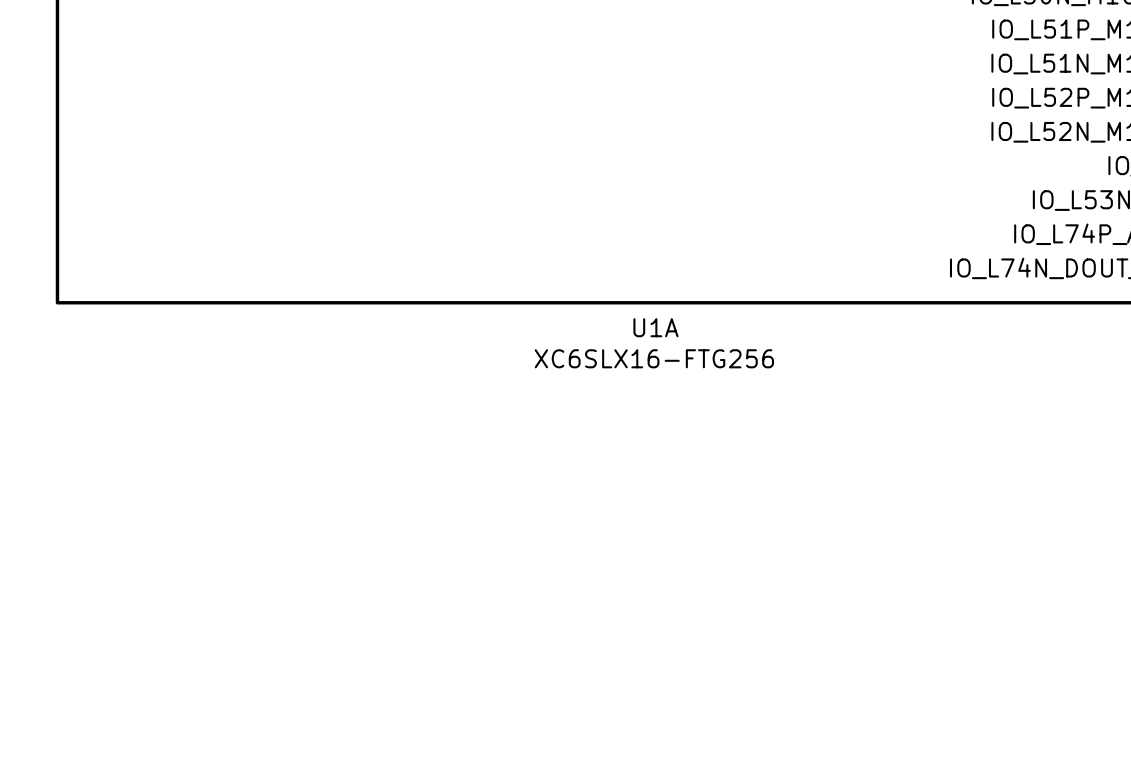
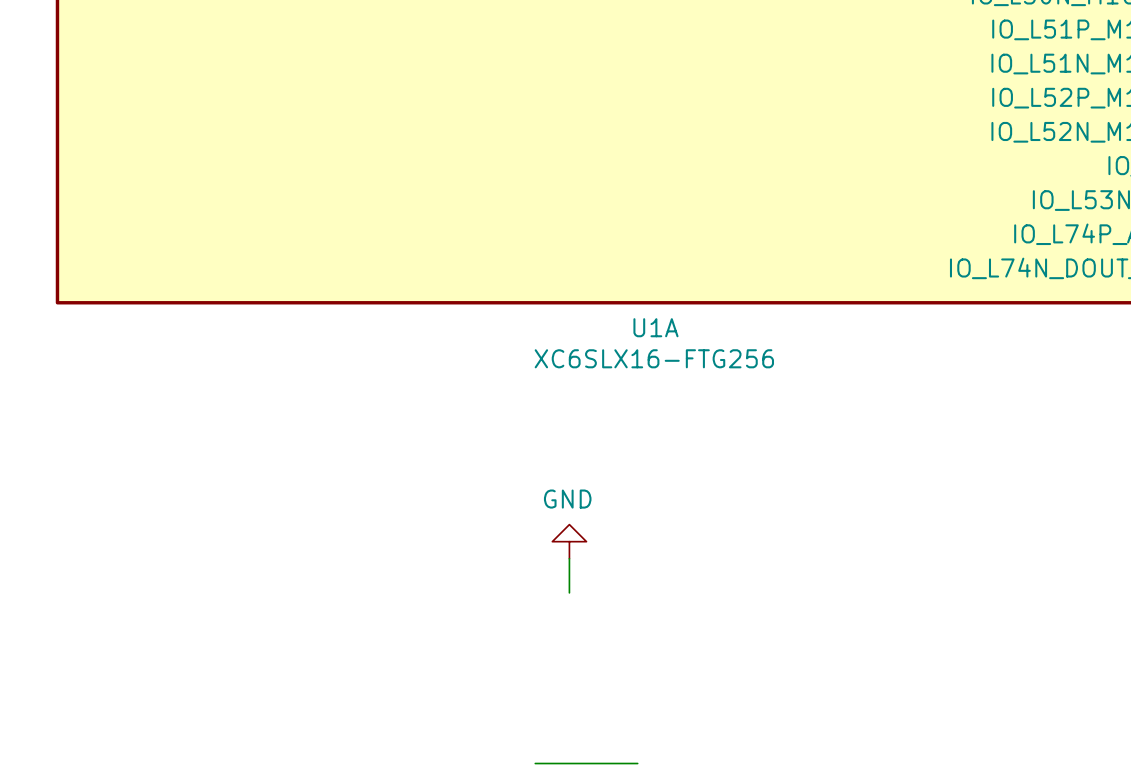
power symbol: none -> GND (569, 541)
wire: none -> (569, 558) (569, 592)
wire: none -> (535, 763) (637, 763)

